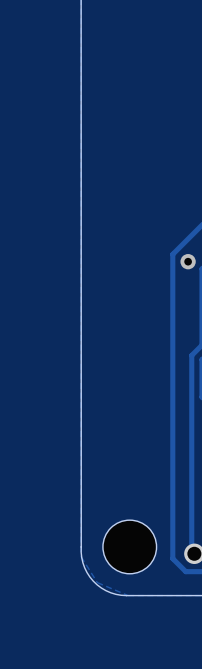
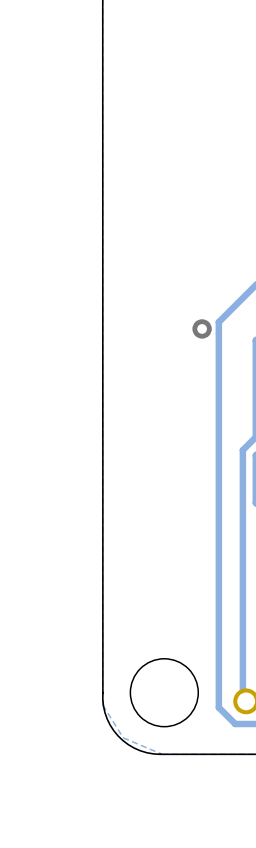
via: none -> (202, 328)
via: (188, 261) -> none

